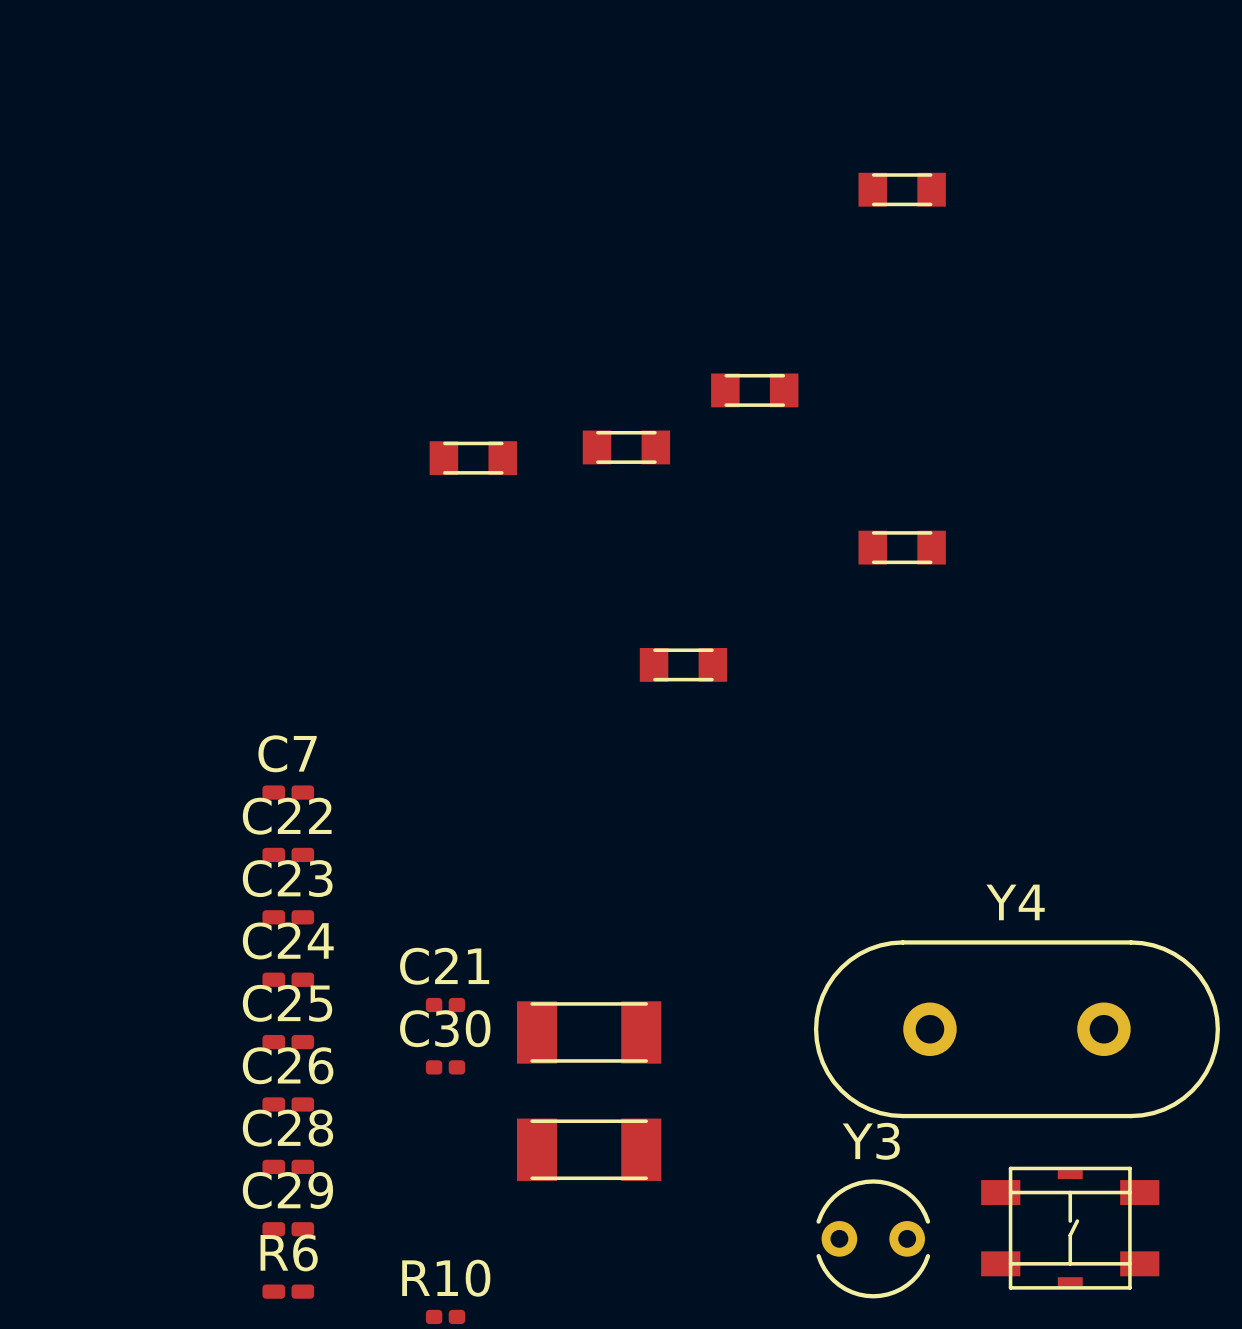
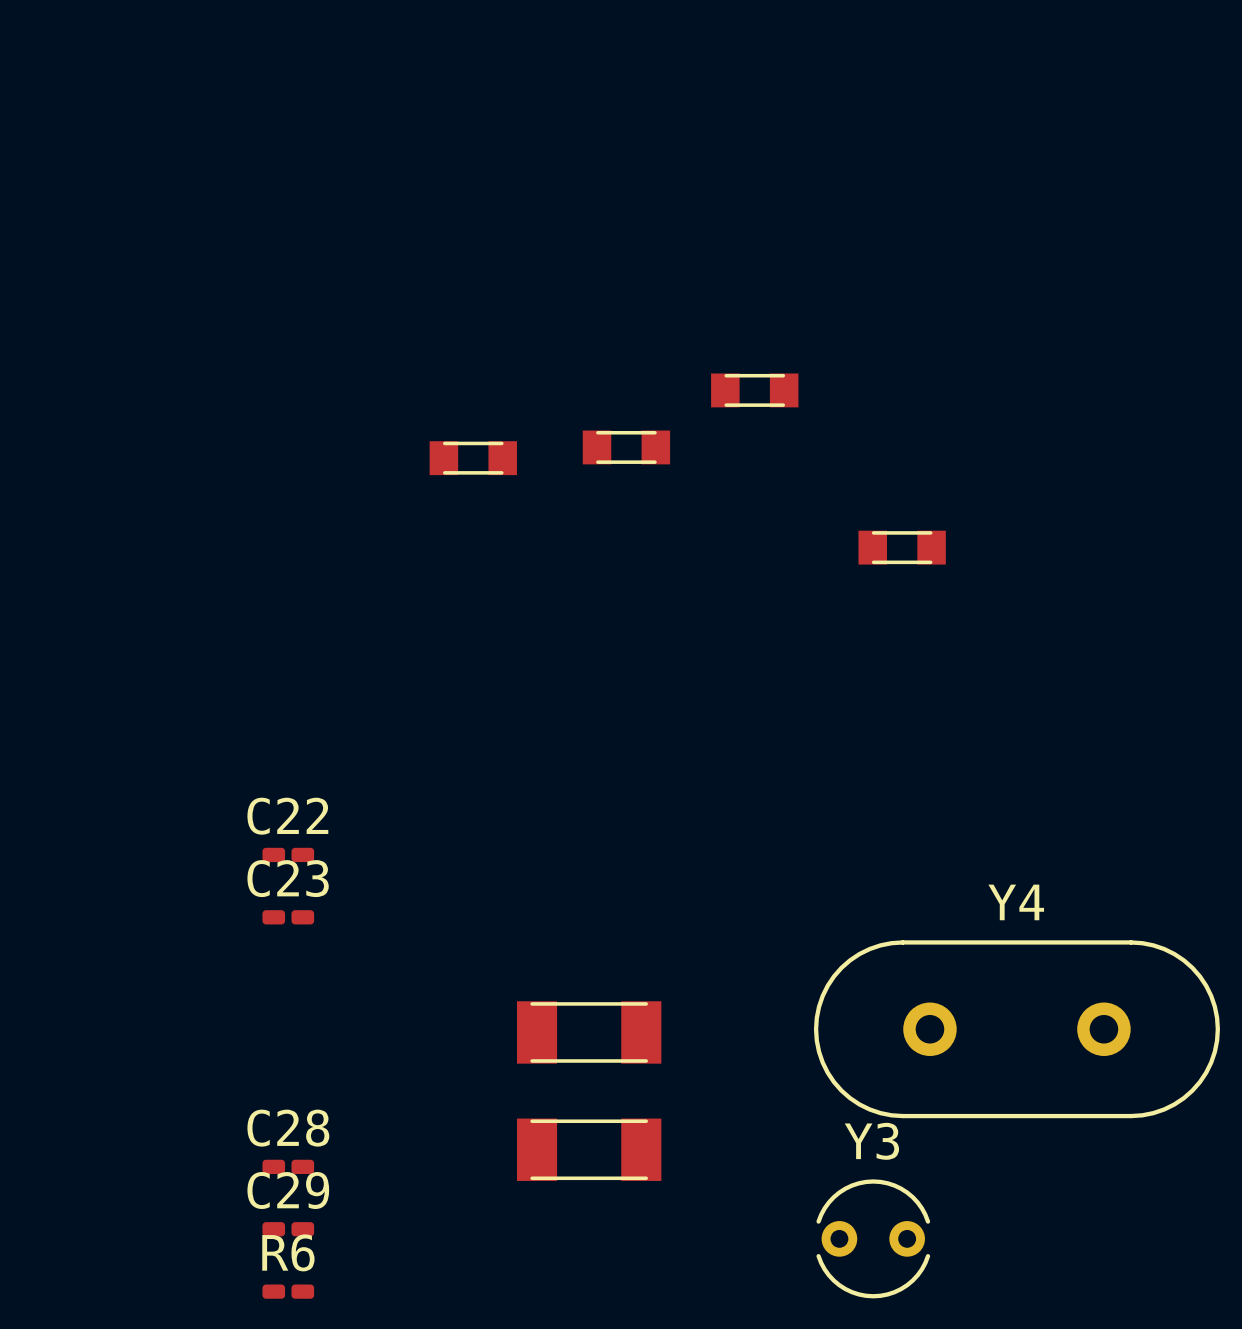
part: (902, 189) -> none
part: (683, 664) -> none
C7: (288, 792) -> none
C24: (288, 979) -> none
C21: (445, 1005) -> none
C25: (288, 1042) -> none
C30: (445, 1067) -> none
C26: (288, 1104) -> none
part: (1070, 1228) -> none
R10: (445, 1316) -> none

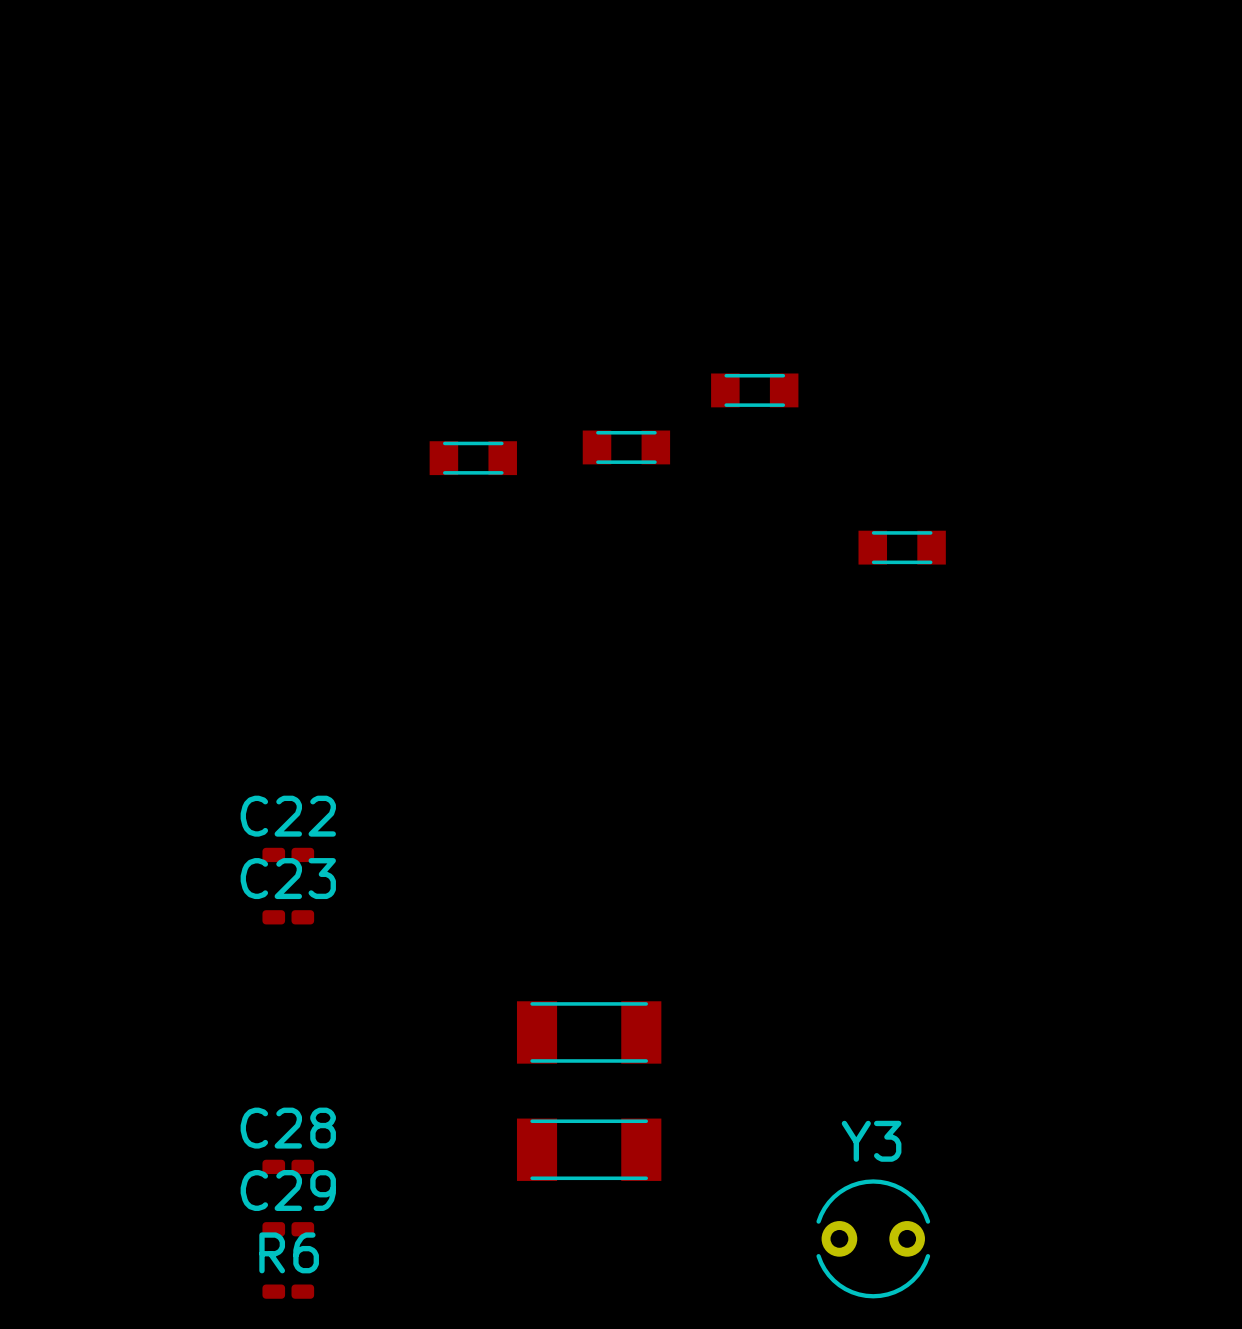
Y4: (1016, 1029) -> none

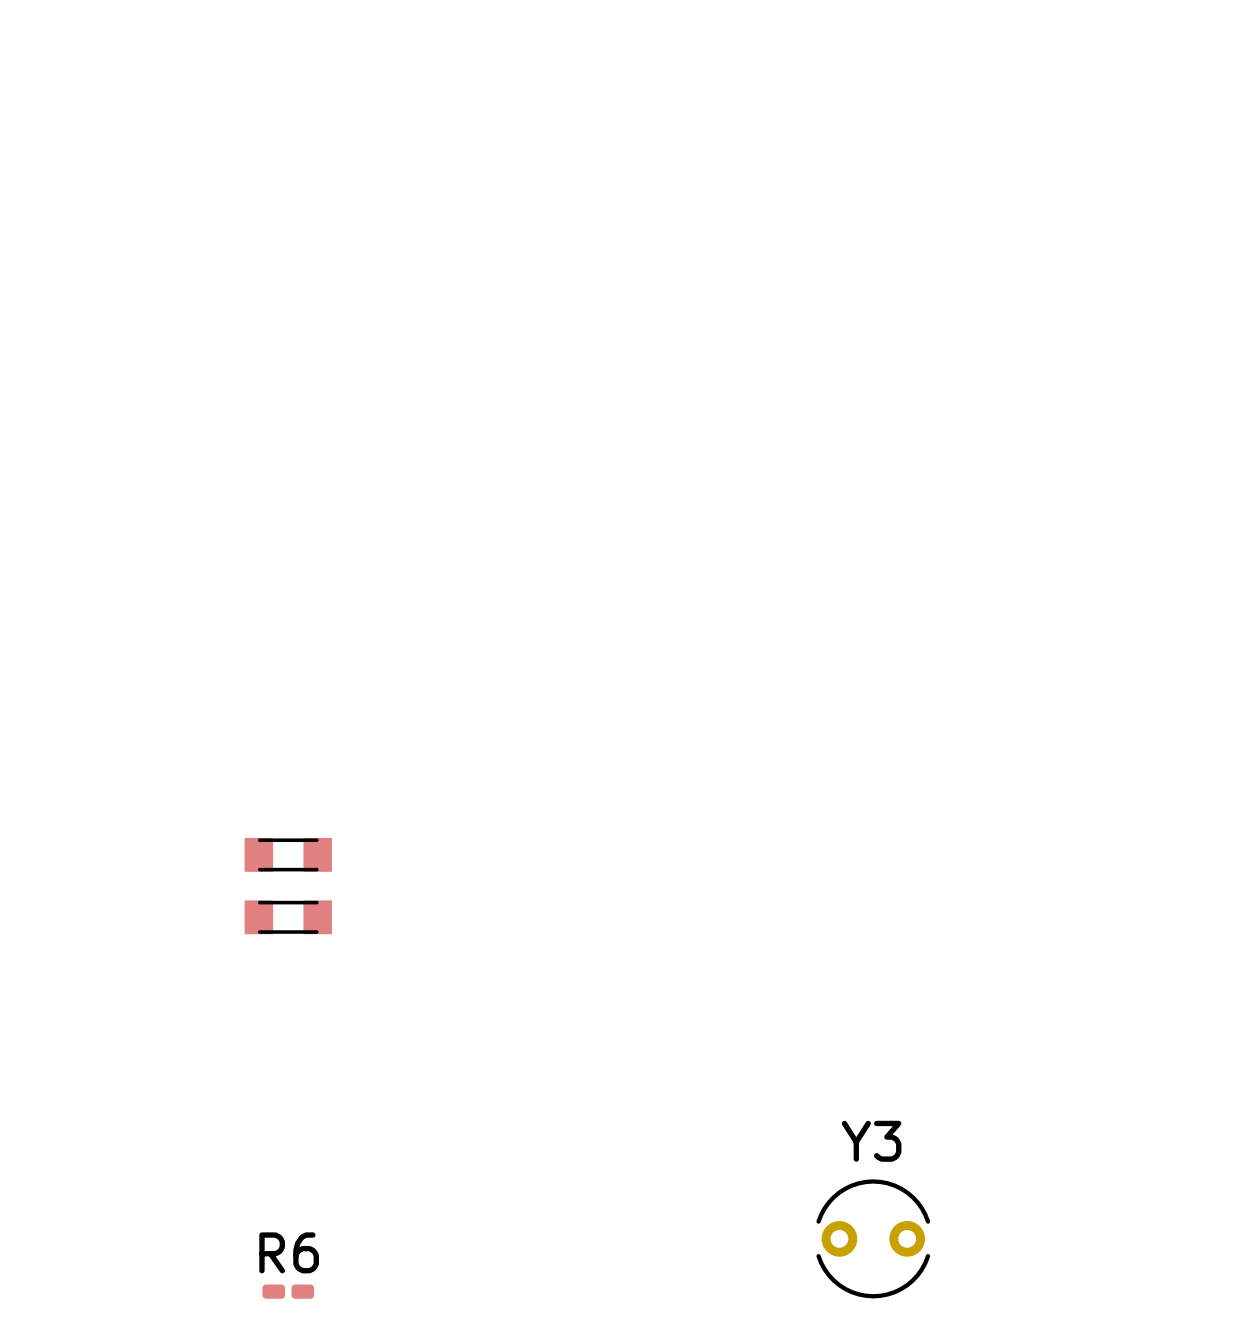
part: (754, 390) -> none
part: (626, 447) -> none
part: (473, 458) -> none
part: (902, 547) -> none
C22: (288, 854) -> none
part: none -> (288, 854)
C23: (288, 917) -> none
part: none -> (288, 917)
part: (589, 1032) -> none
part: (589, 1149) -> none
C28: (288, 1166) -> none
C29: (288, 1229) -> none

